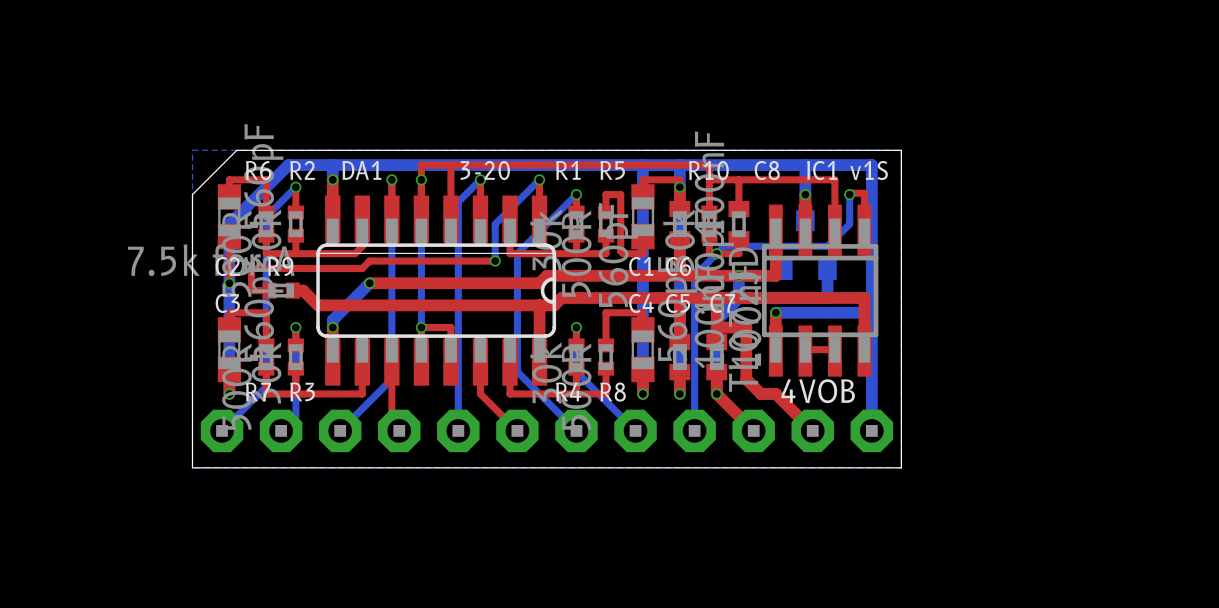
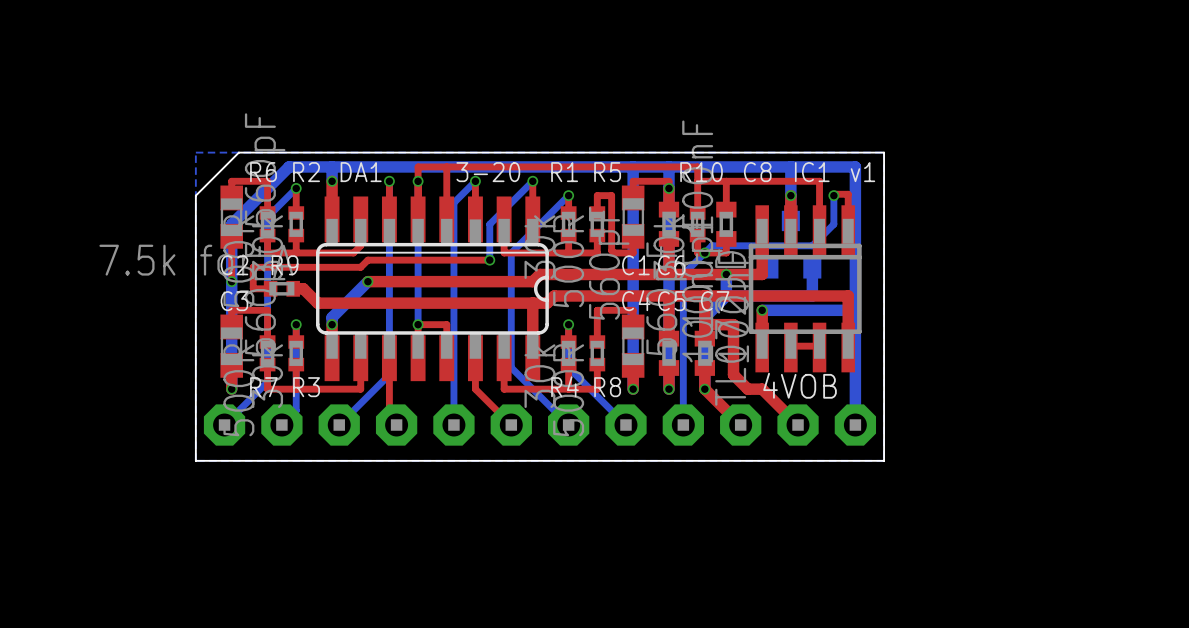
text: v1S (869, 170) -> v1 (862, 172)

